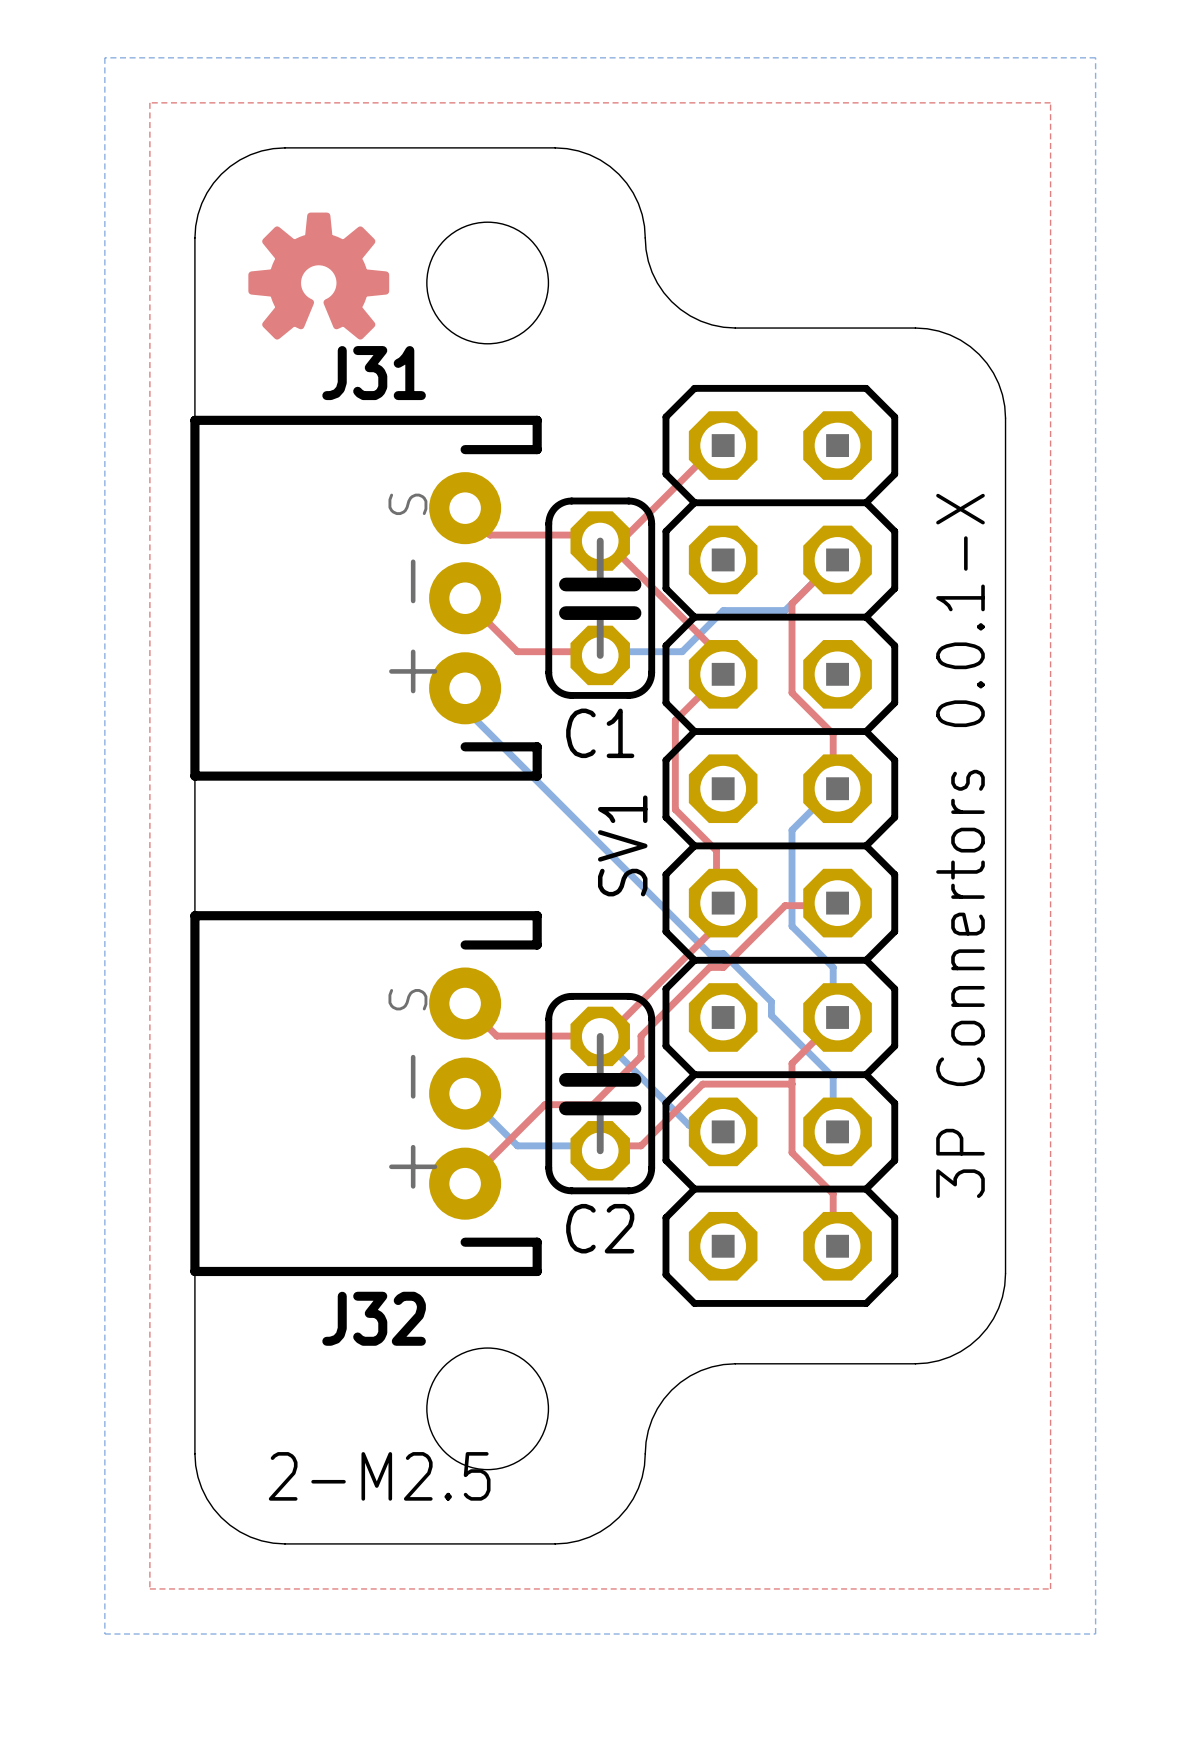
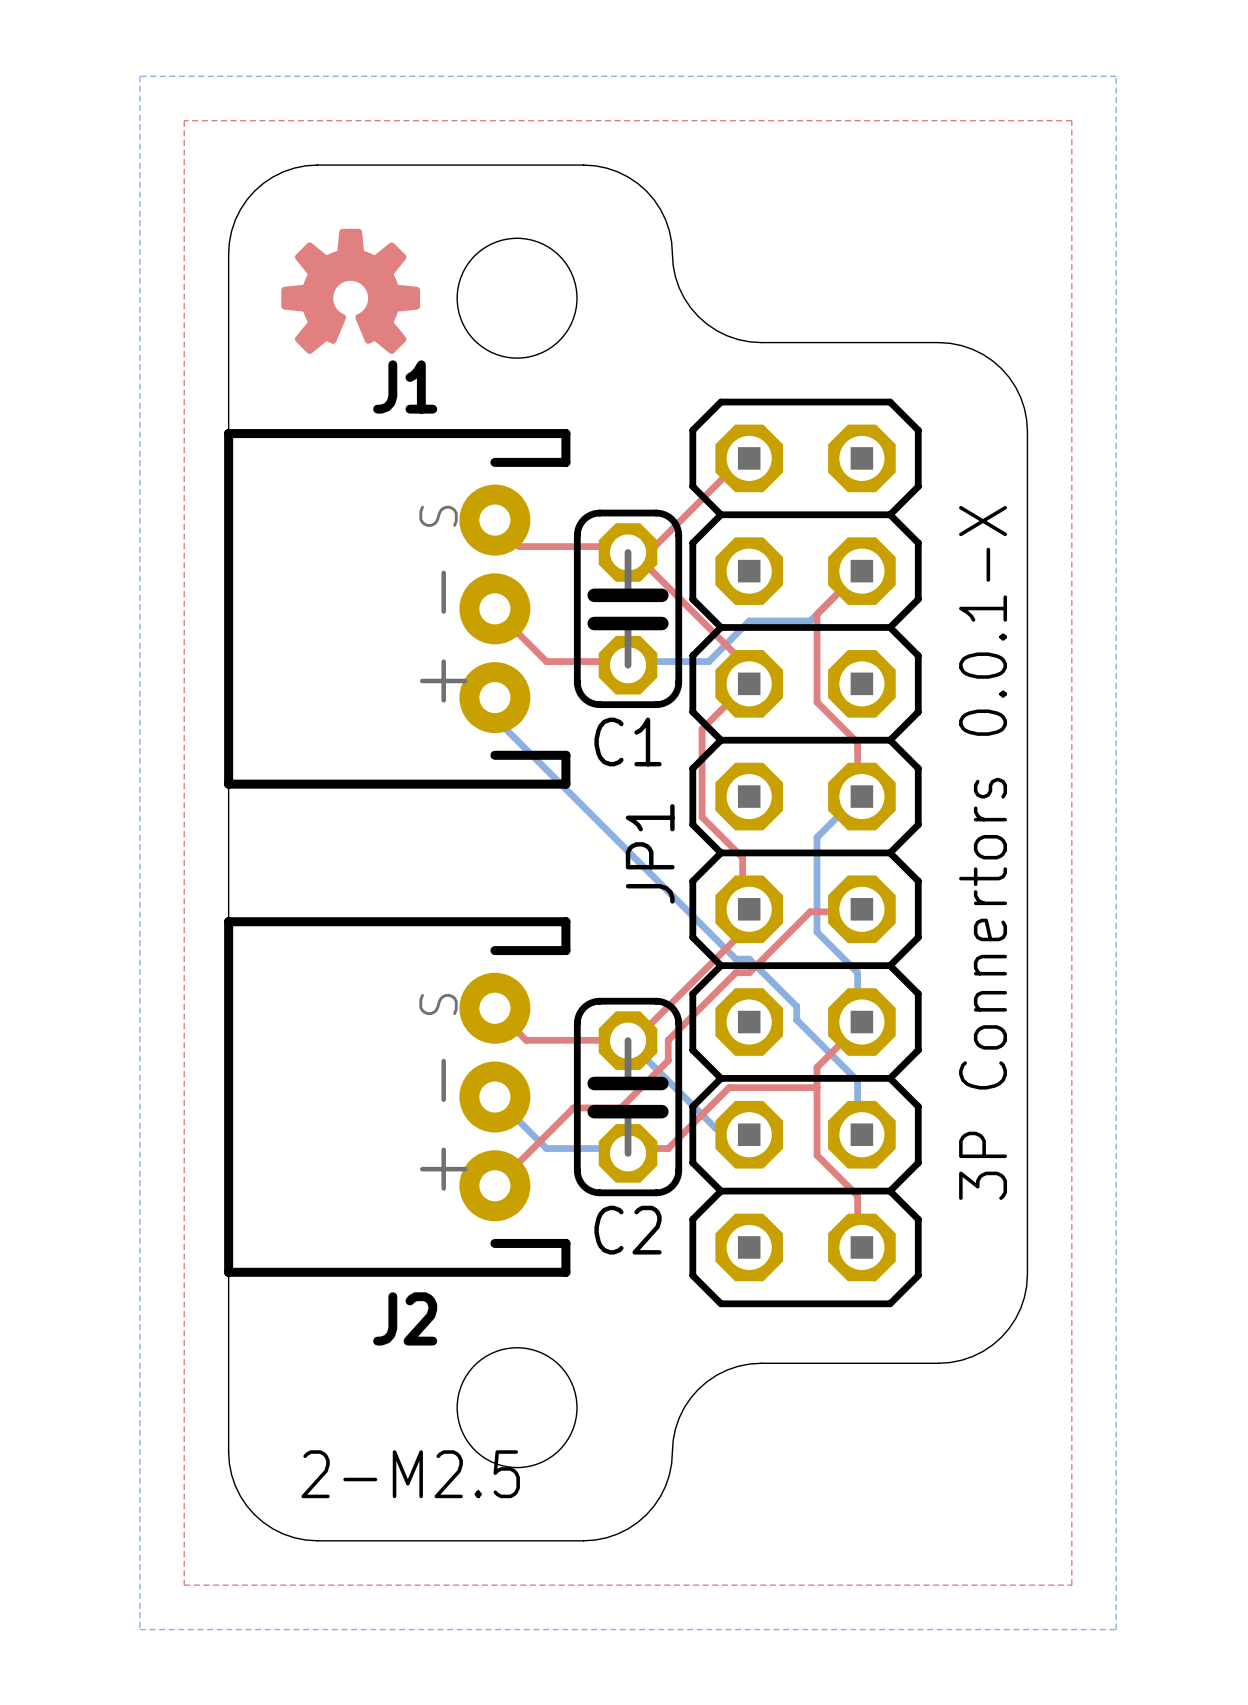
J31 name: J31 (374, 373) -> J1 (405, 386)
SV1 name: SV1 (622, 845) -> JP1 (650, 853)
J32 name: J32 (374, 1318) -> J2 (405, 1318)

